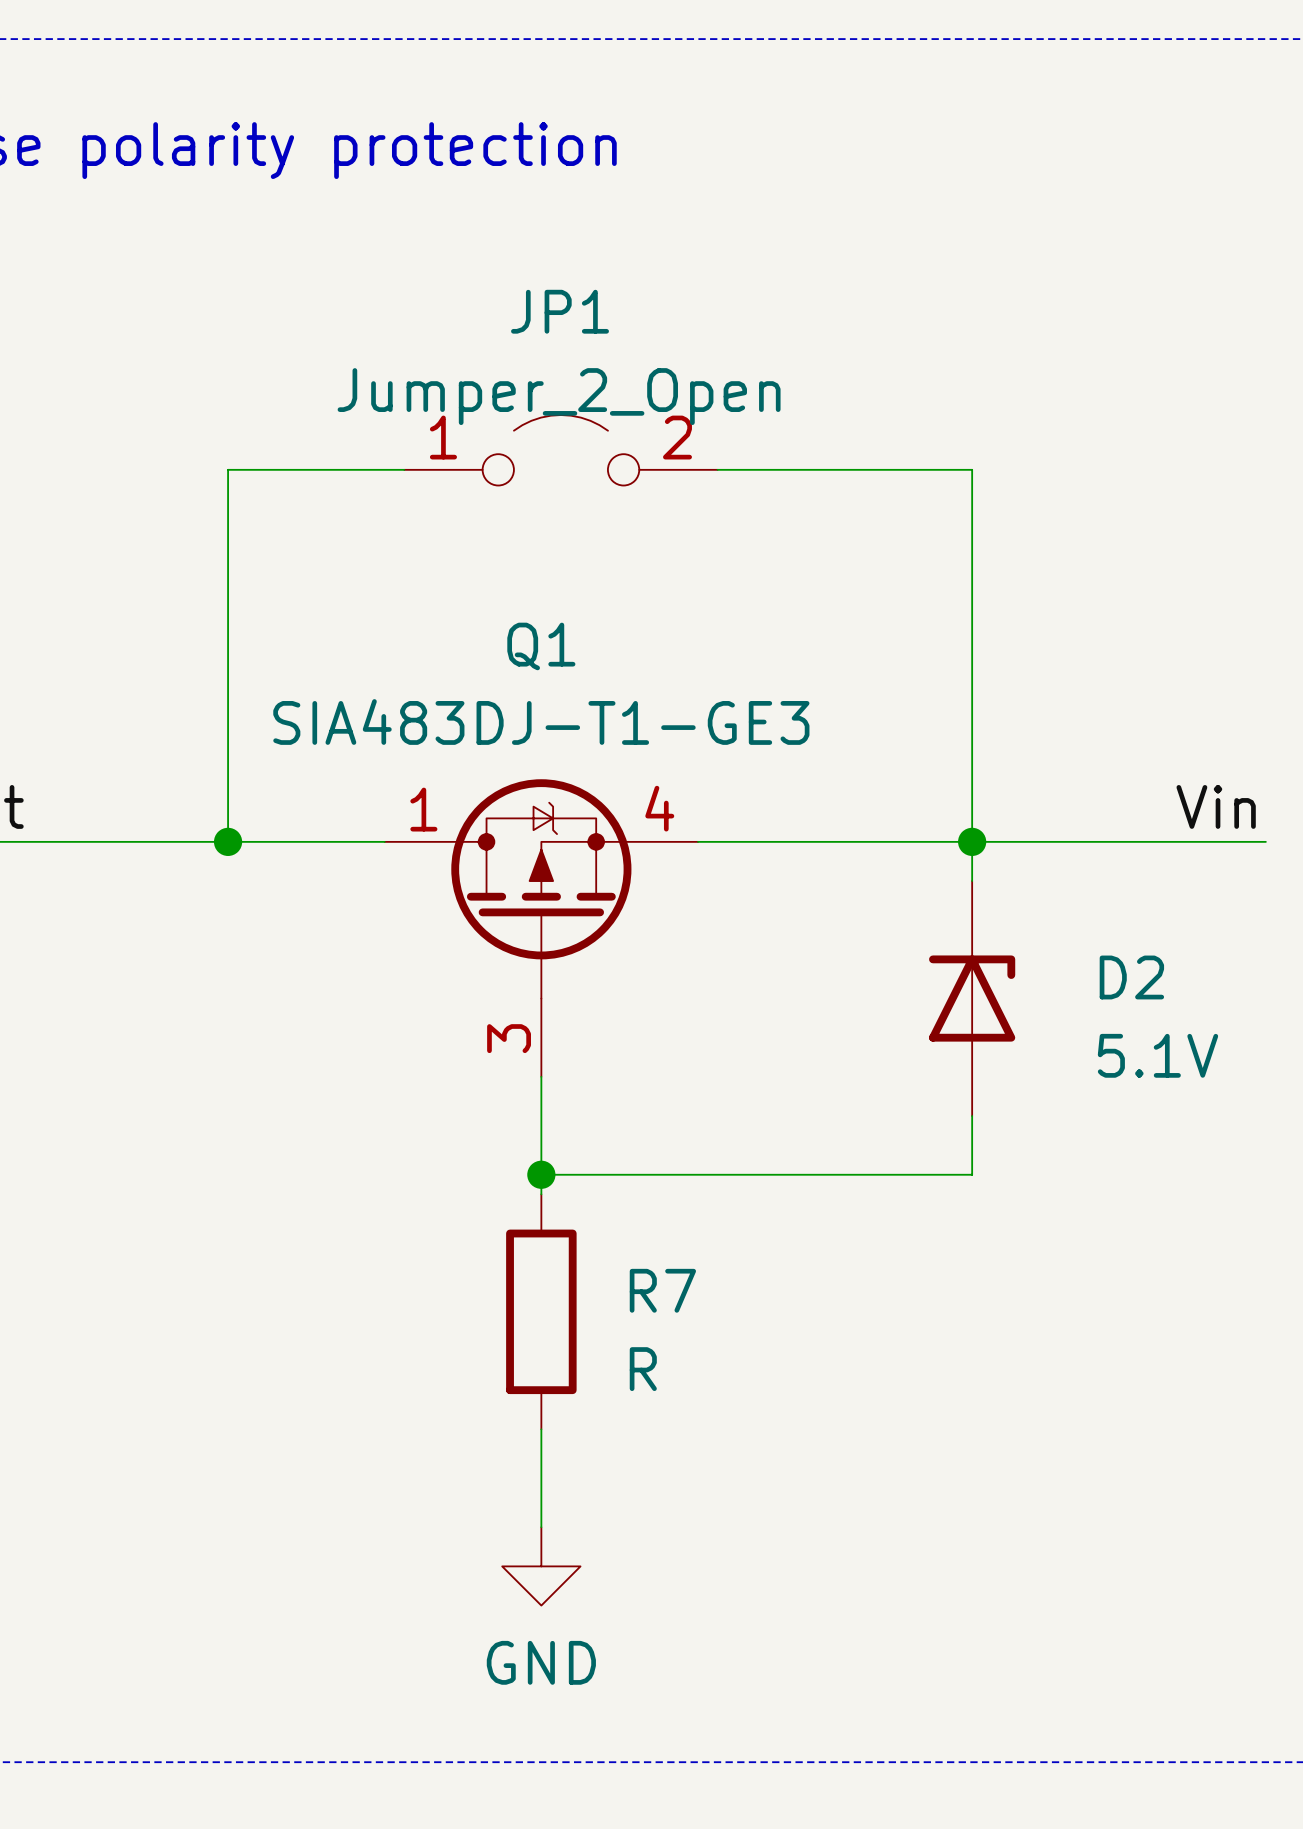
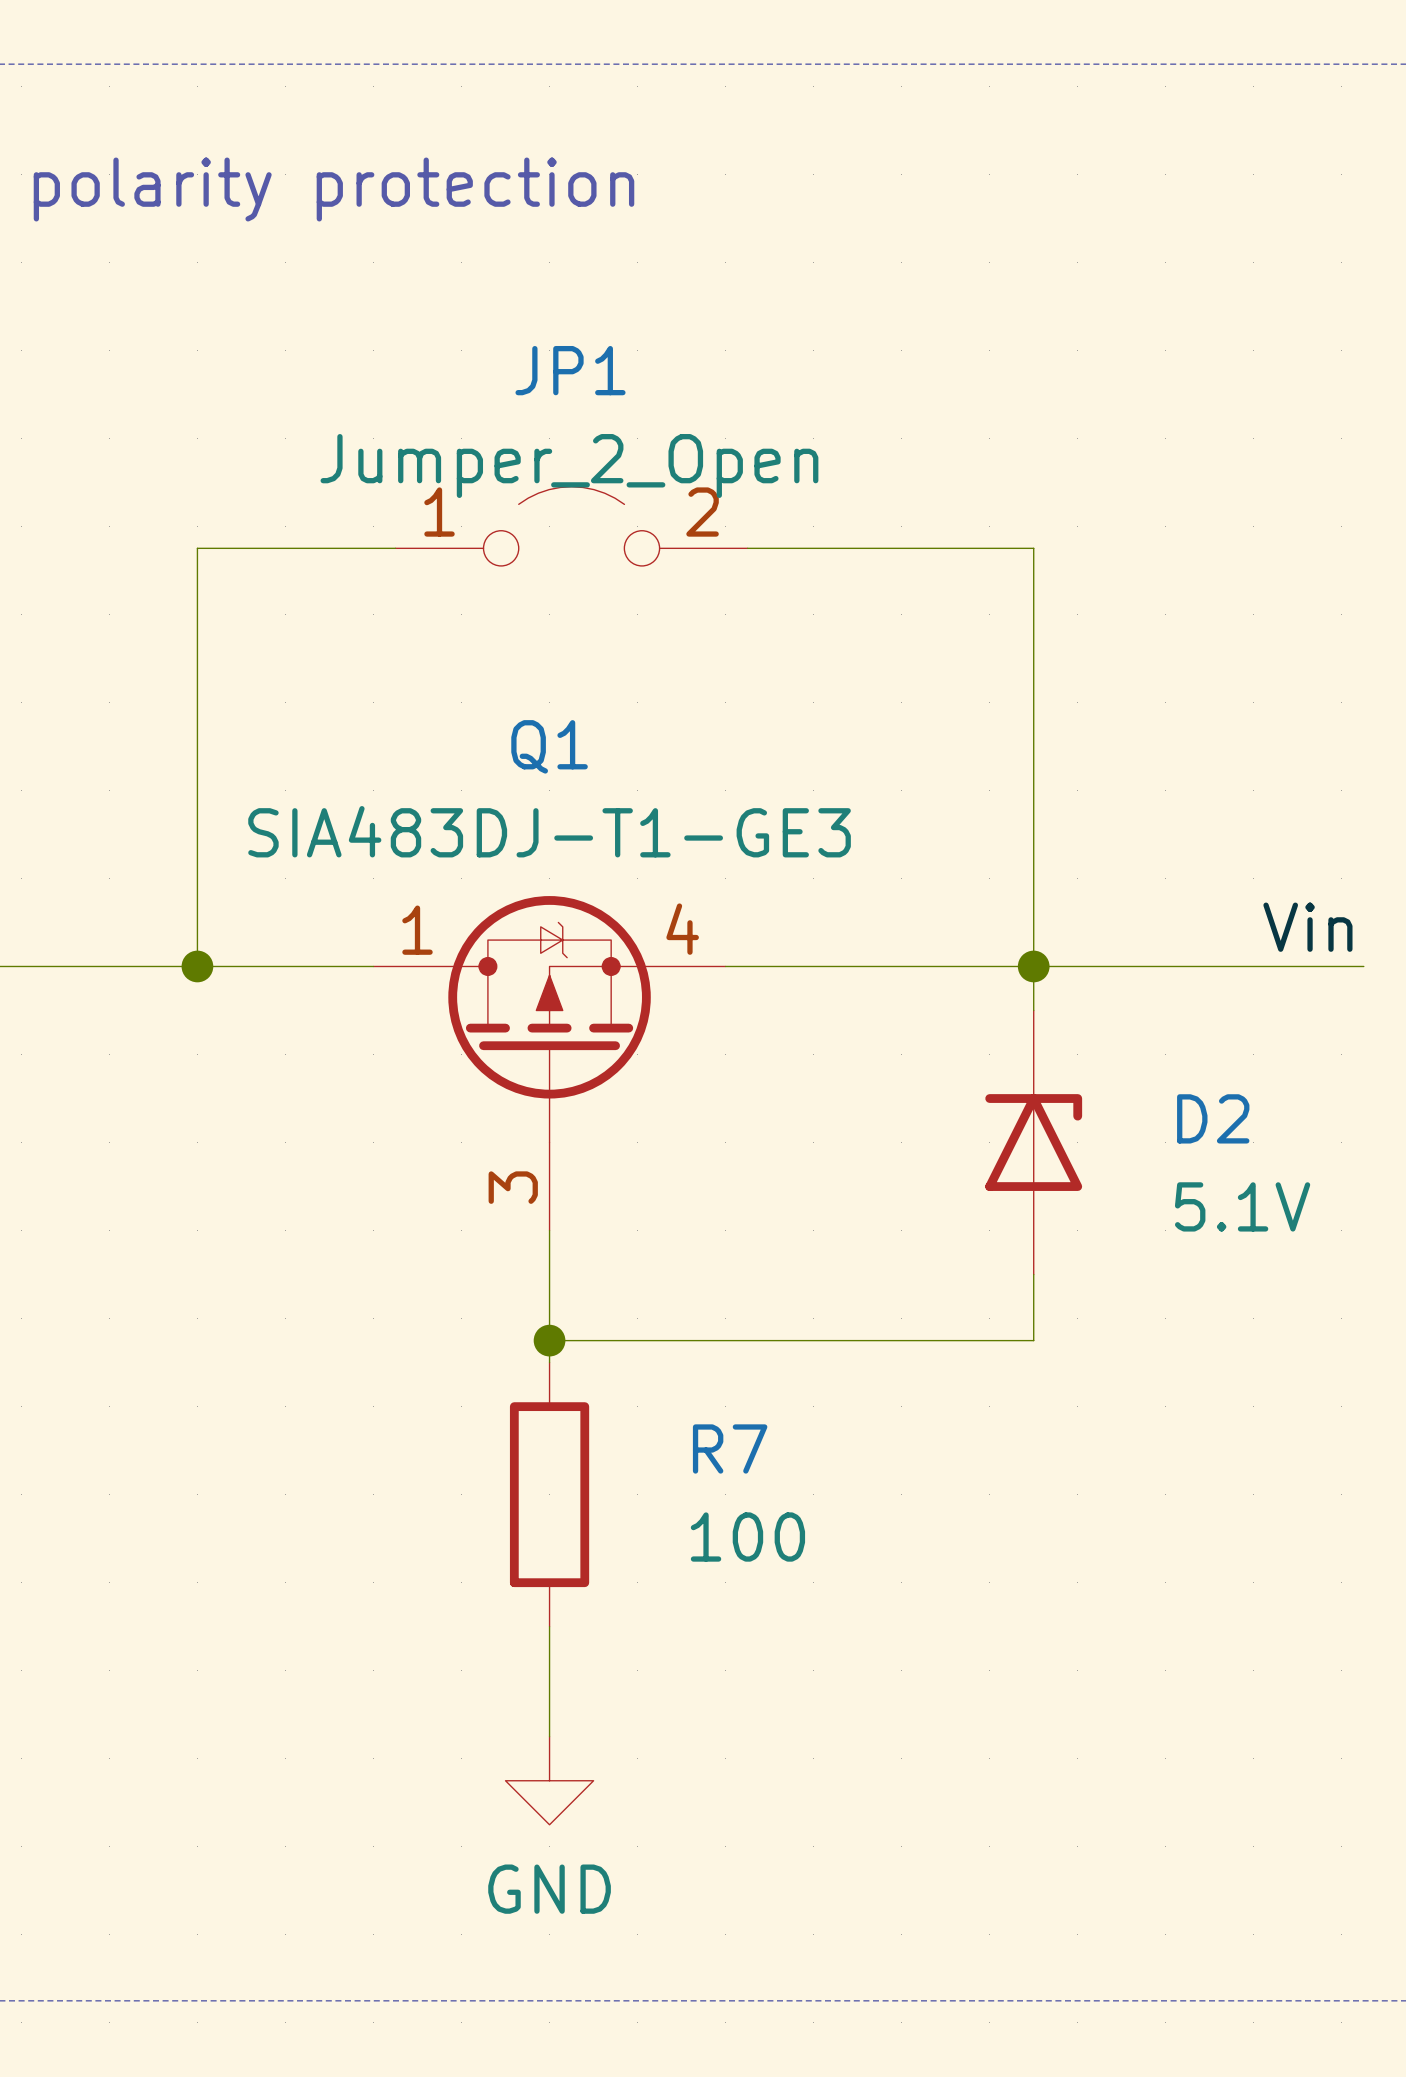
R7 name position: R7 (662, 1290) -> R7 (730, 1448)
R7 value: R (643, 1369) -> 100 (747, 1537)

